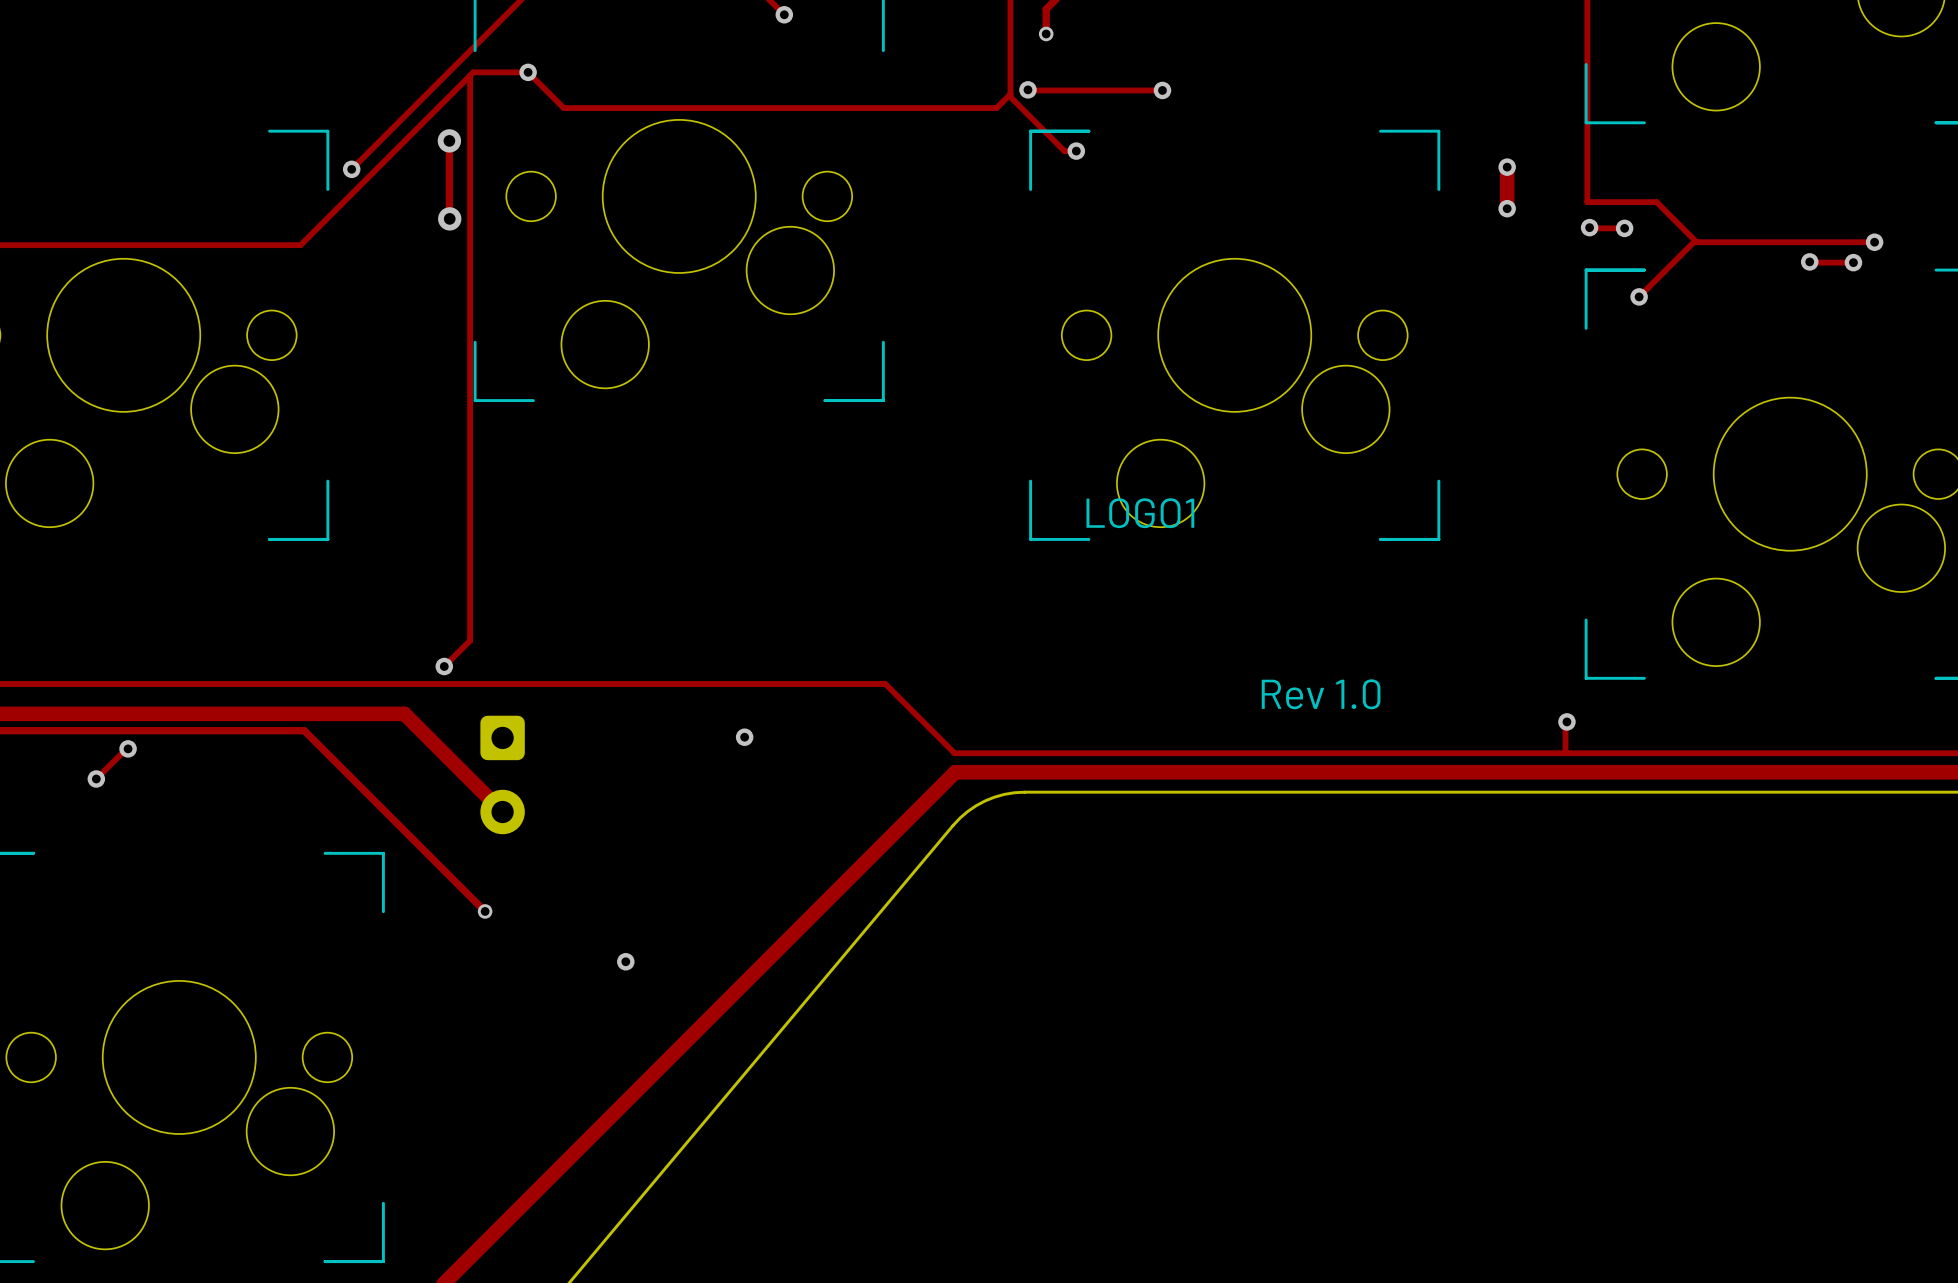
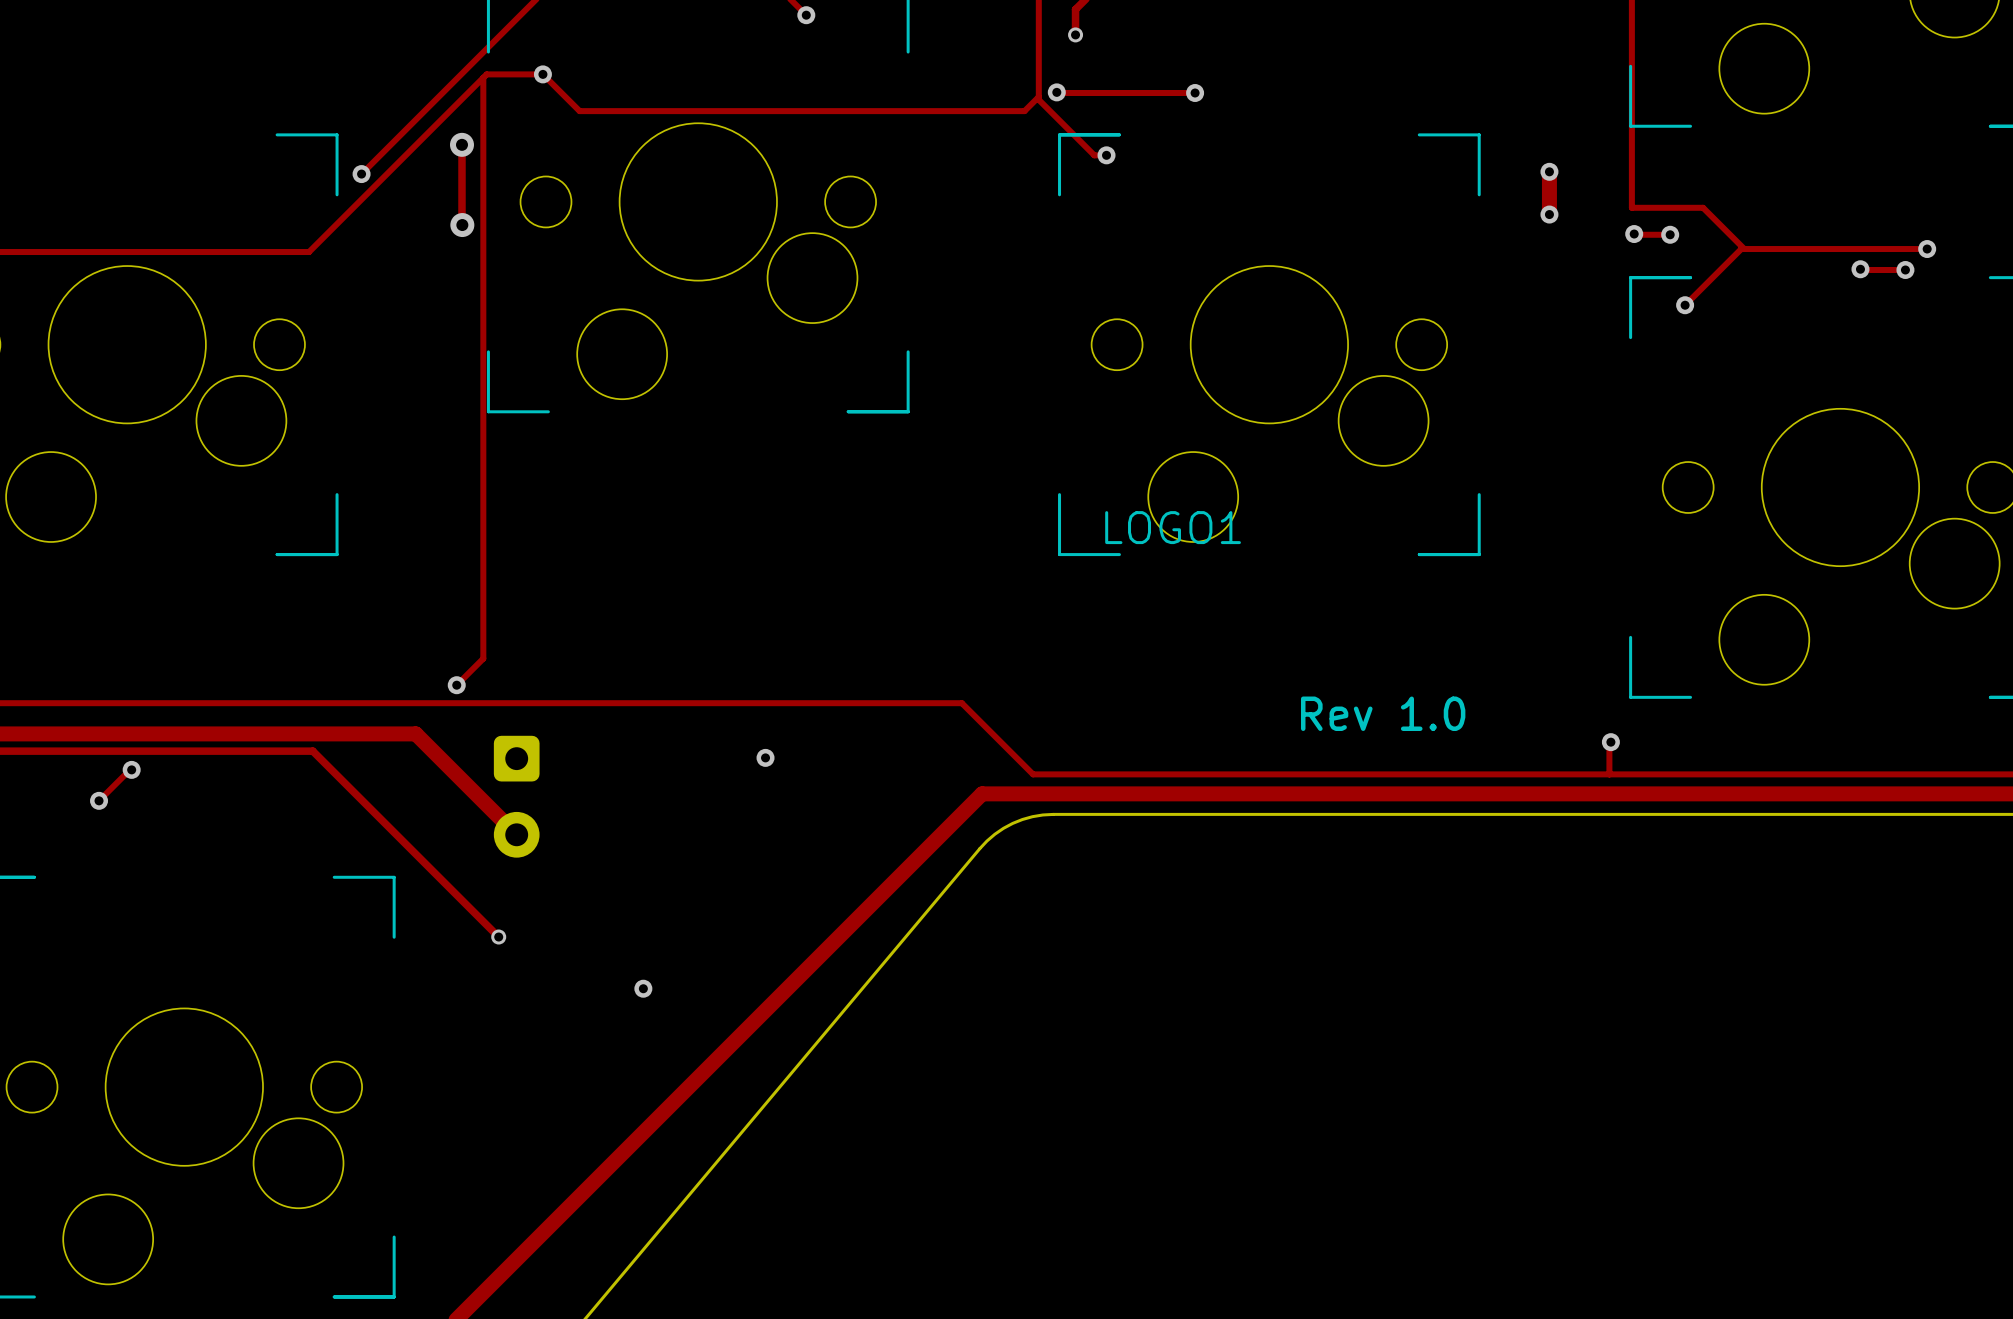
track: (885, 684) (954, 753) (1004, 753) -> (910, 703) (961, 703) (1033, 774)

